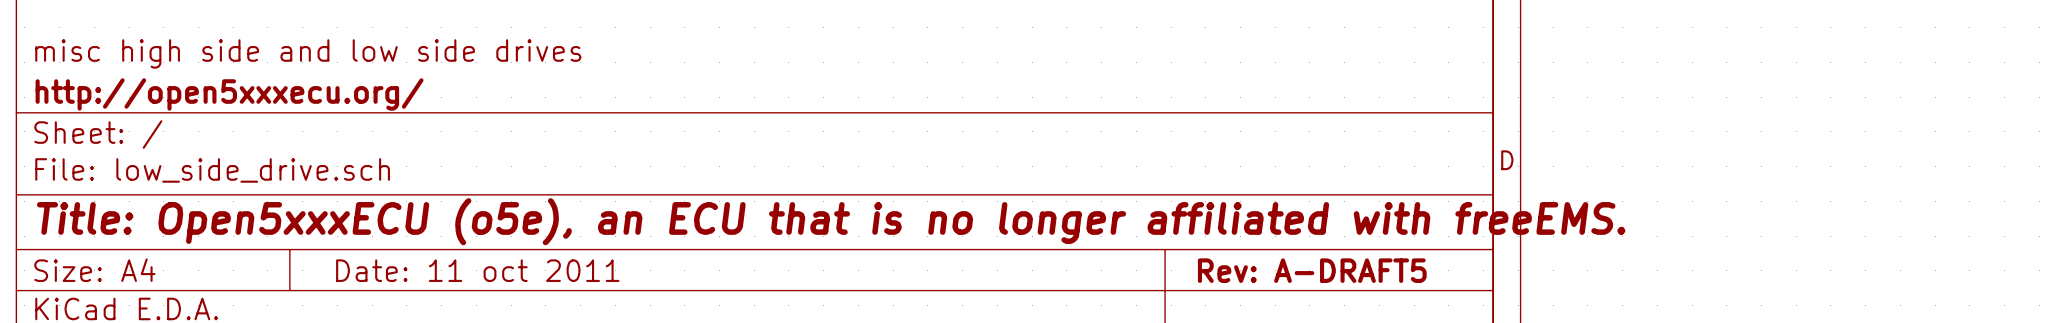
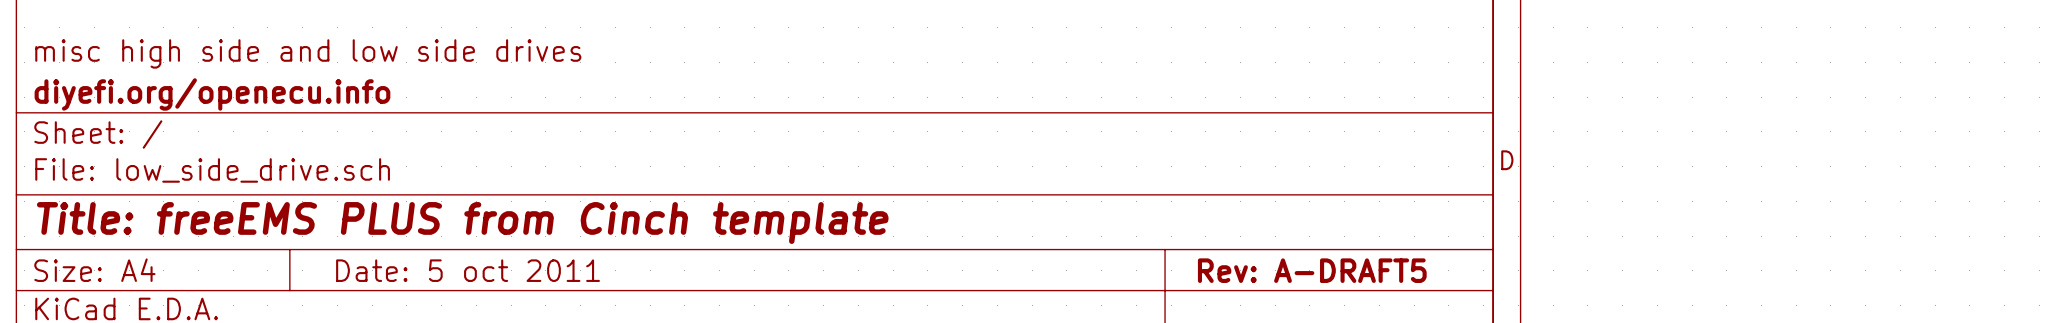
title block: http://open5xxxecu.org/ (229, 94) -> diyefi.org/openecu.info (212, 94)
title block: Title: Open5xxxECU (o5e), an ECU that is no longer affiliated with freeEMS. (831, 221) -> Title: freeEMS PLUS from Cinch template (462, 223)
title block: Date: 11 oct 2011 (477, 270) -> Date: 5 oct 2011 (468, 270)

